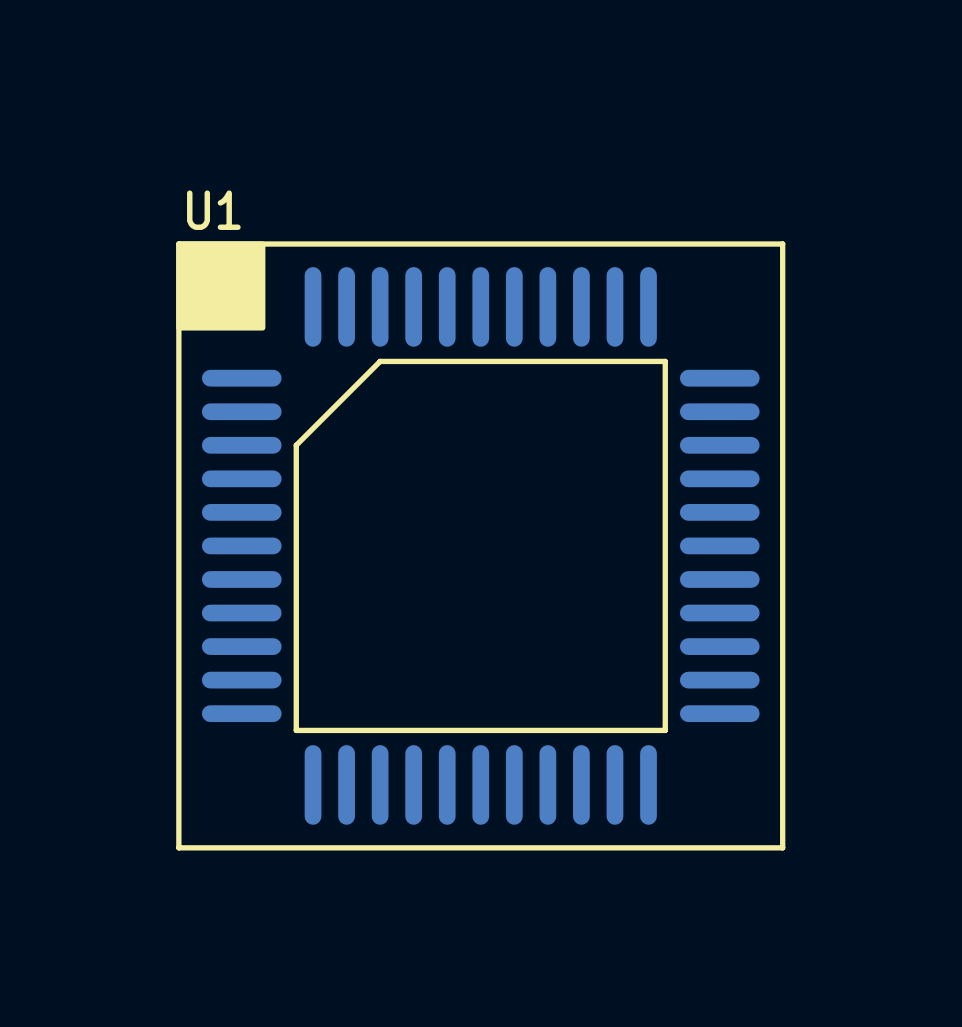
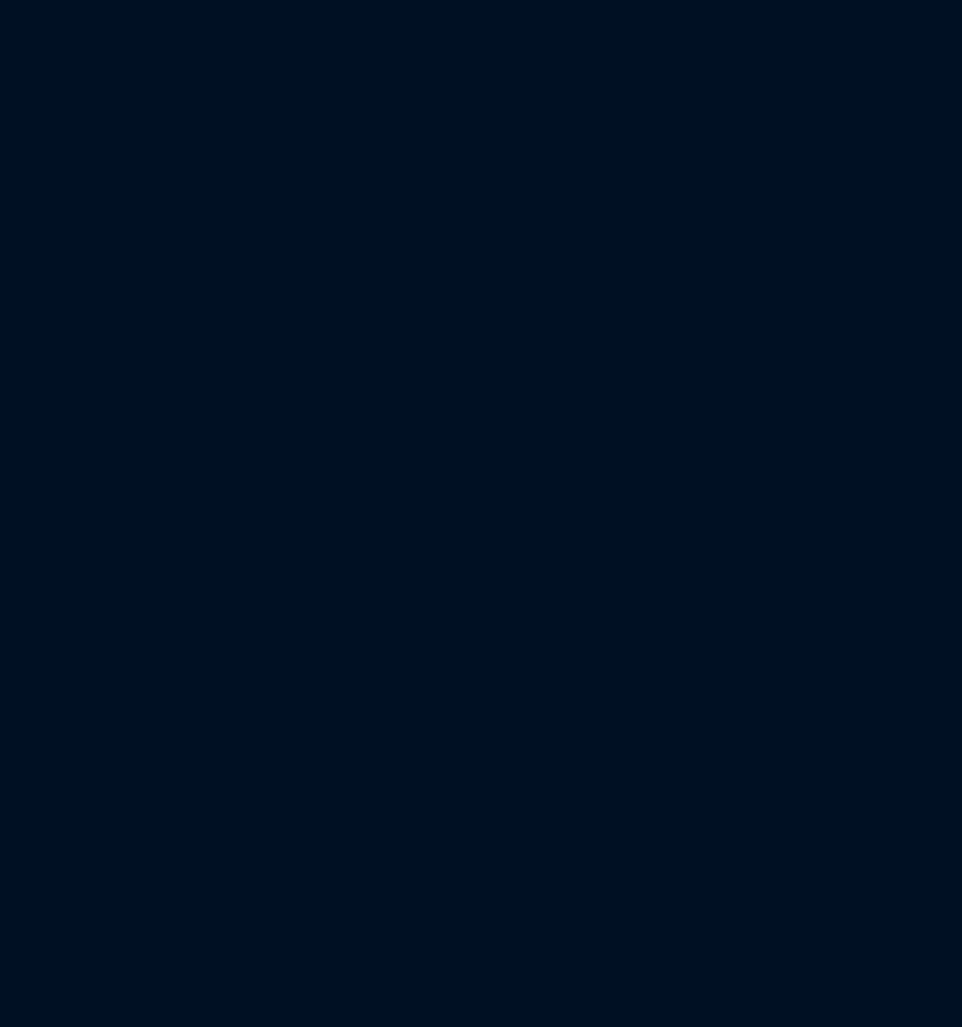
U1: (480, 545) -> none

